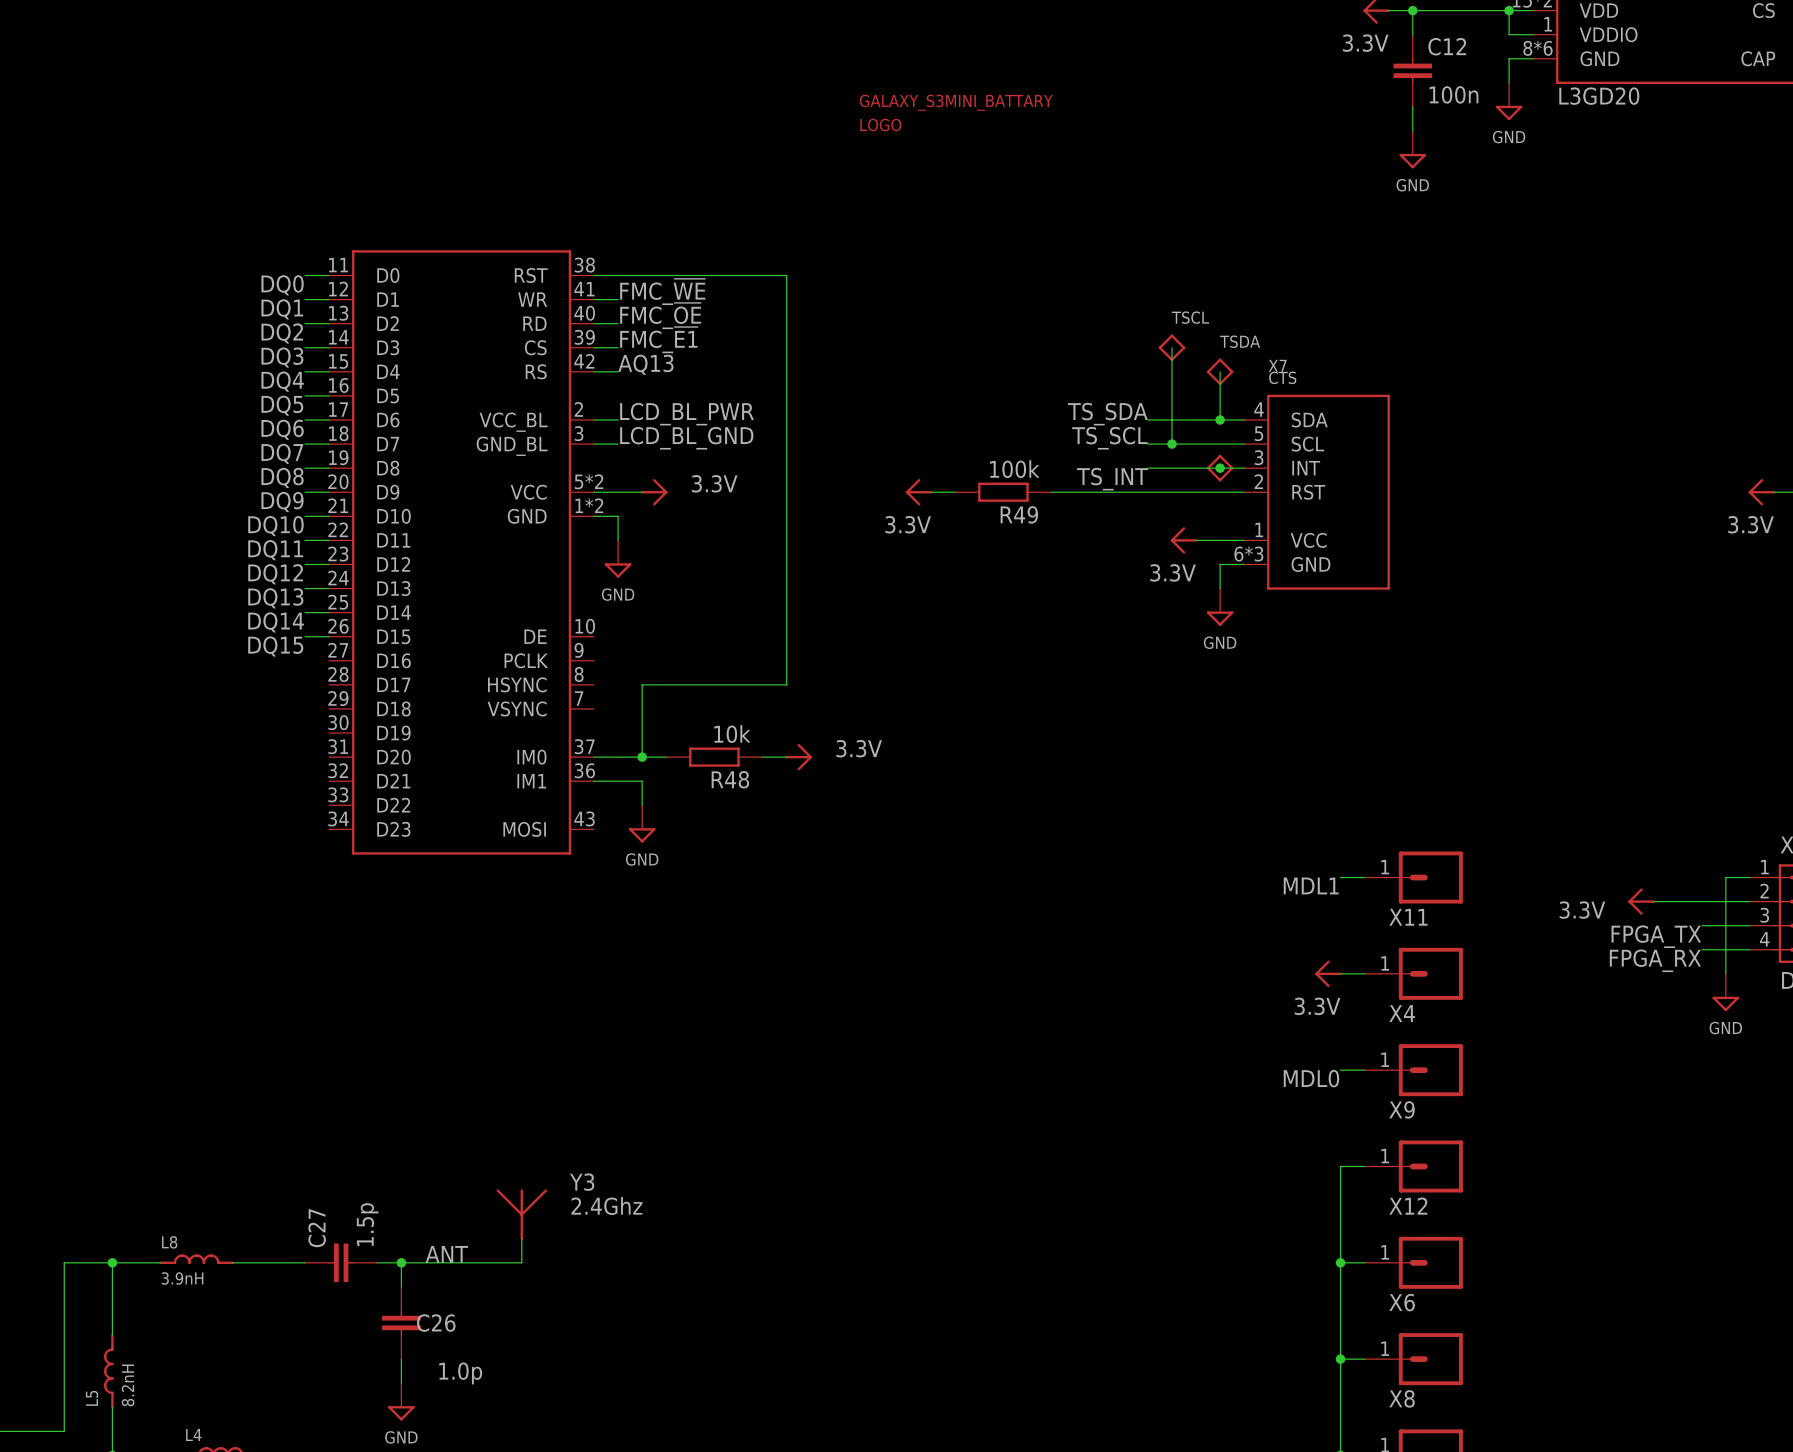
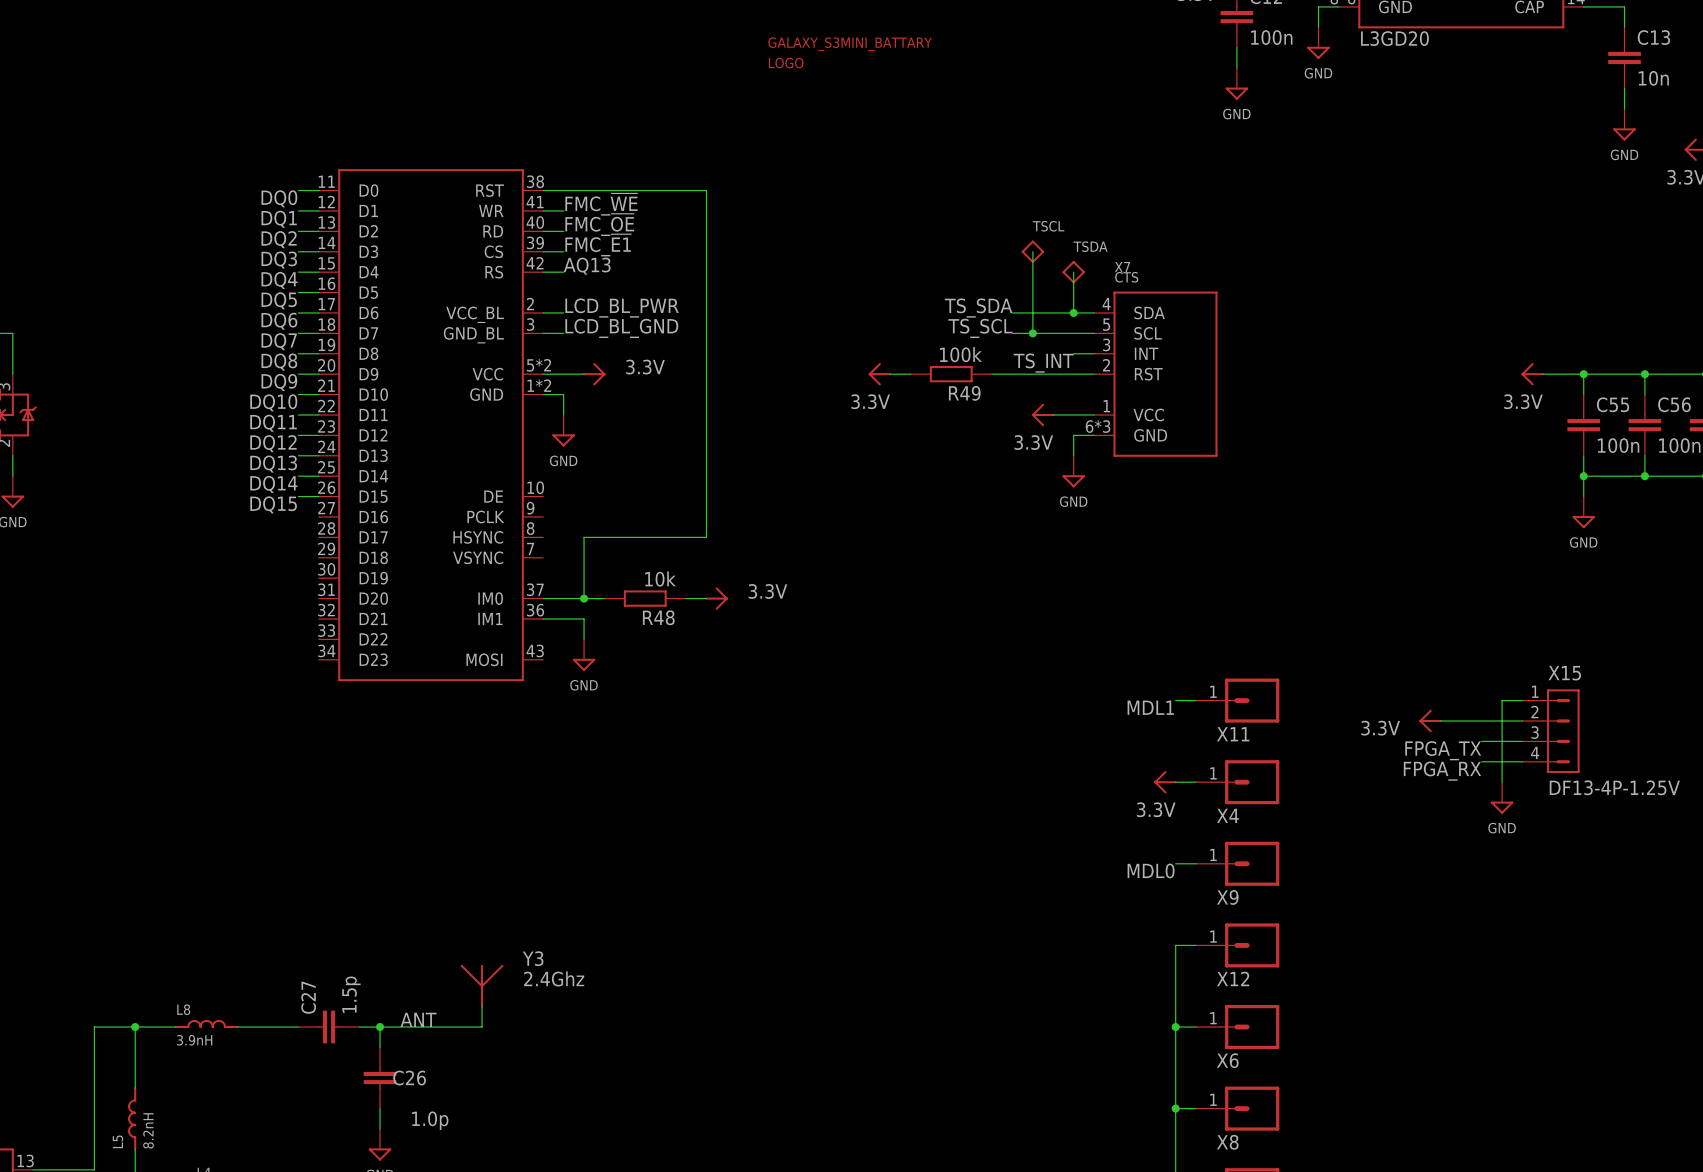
wire: (1147, 468) (1220, 468) -> none
part: (1220, 468) -> none
junction: (1220, 468) -> none
label position: TS_INT (1112, 479) -> TS_INT (1043, 363)
power symbol position: 3.3V (919, 492) -> 3.3V (879, 374)
wire: (931, 492) (955, 492) -> (890, 374) (910, 374)
R49 position: (1003, 492) -> (951, 374)
wire: (1051, 492) (1123, 492) -> none

